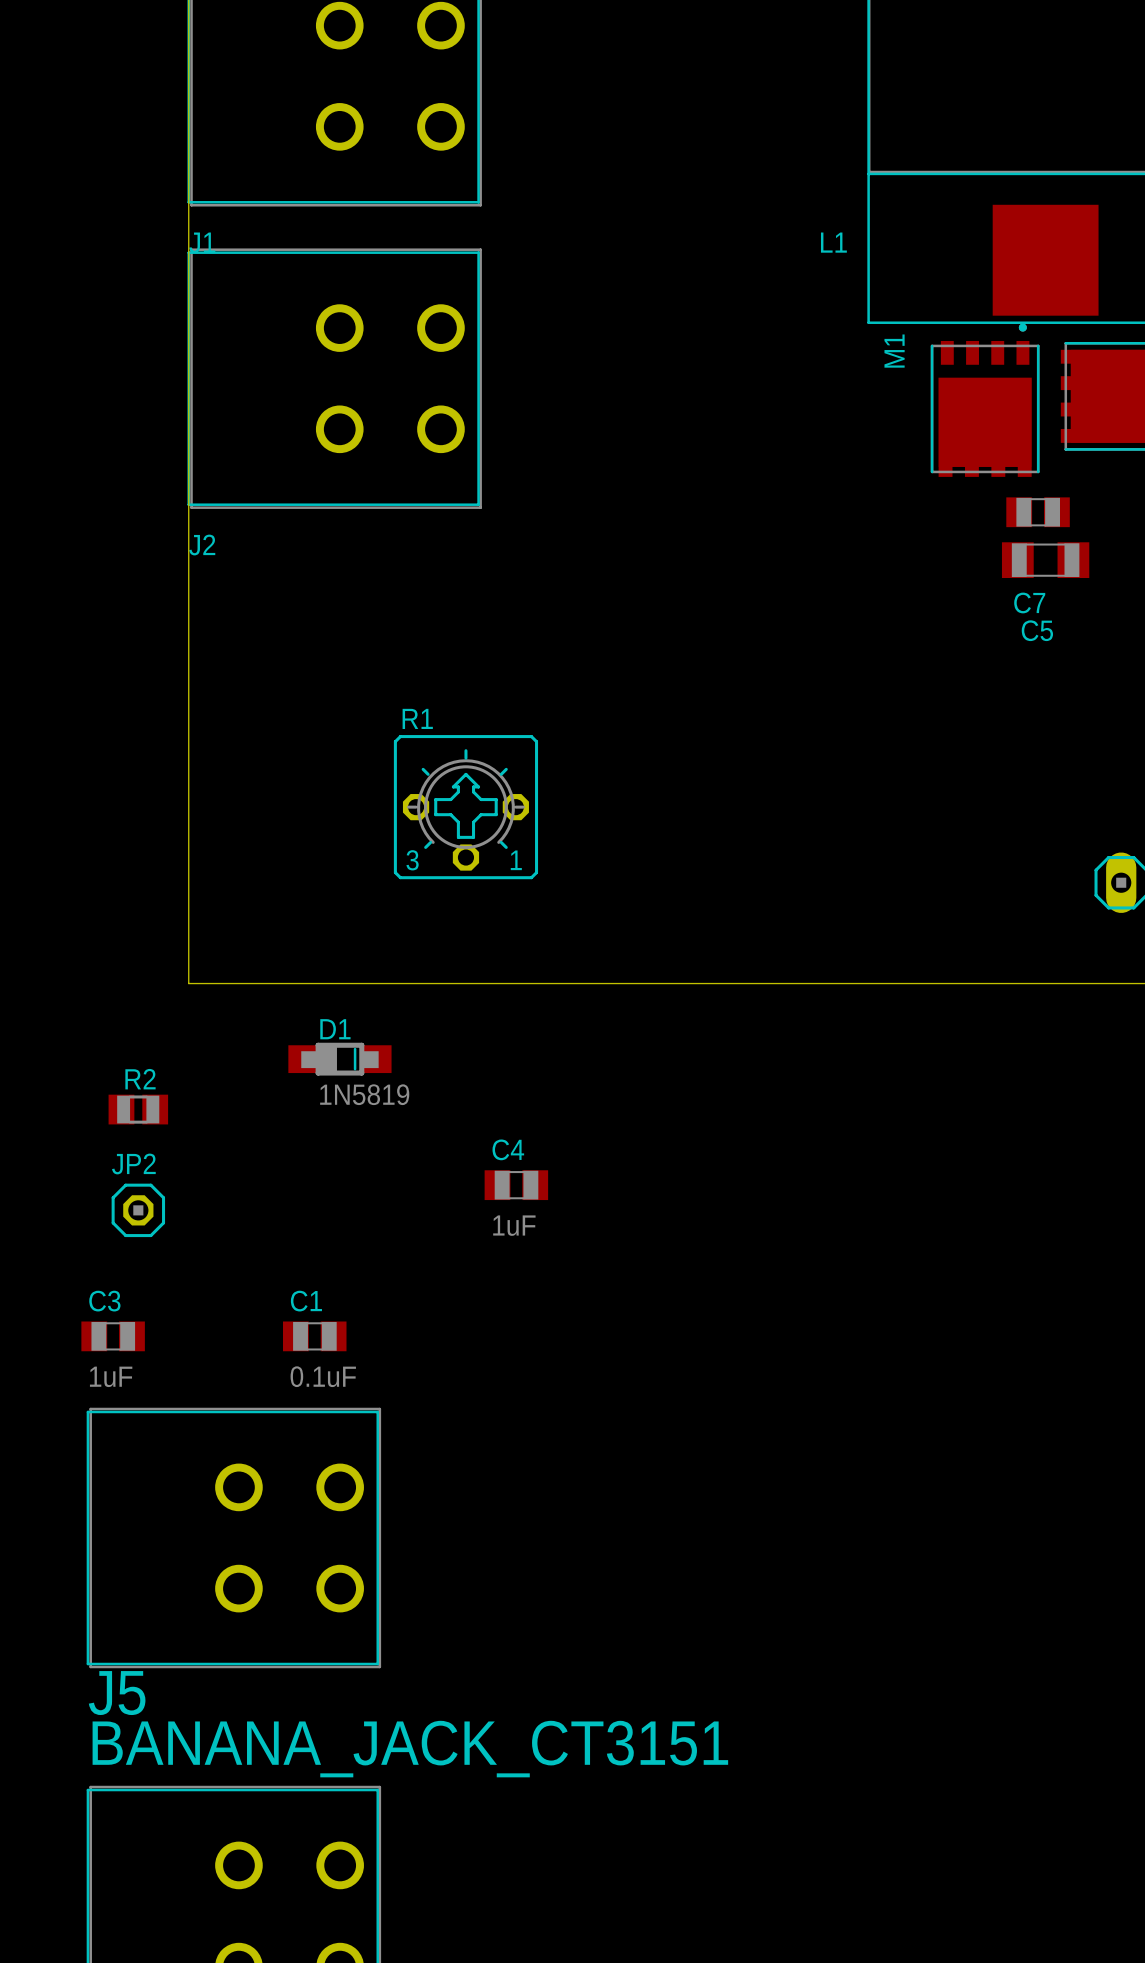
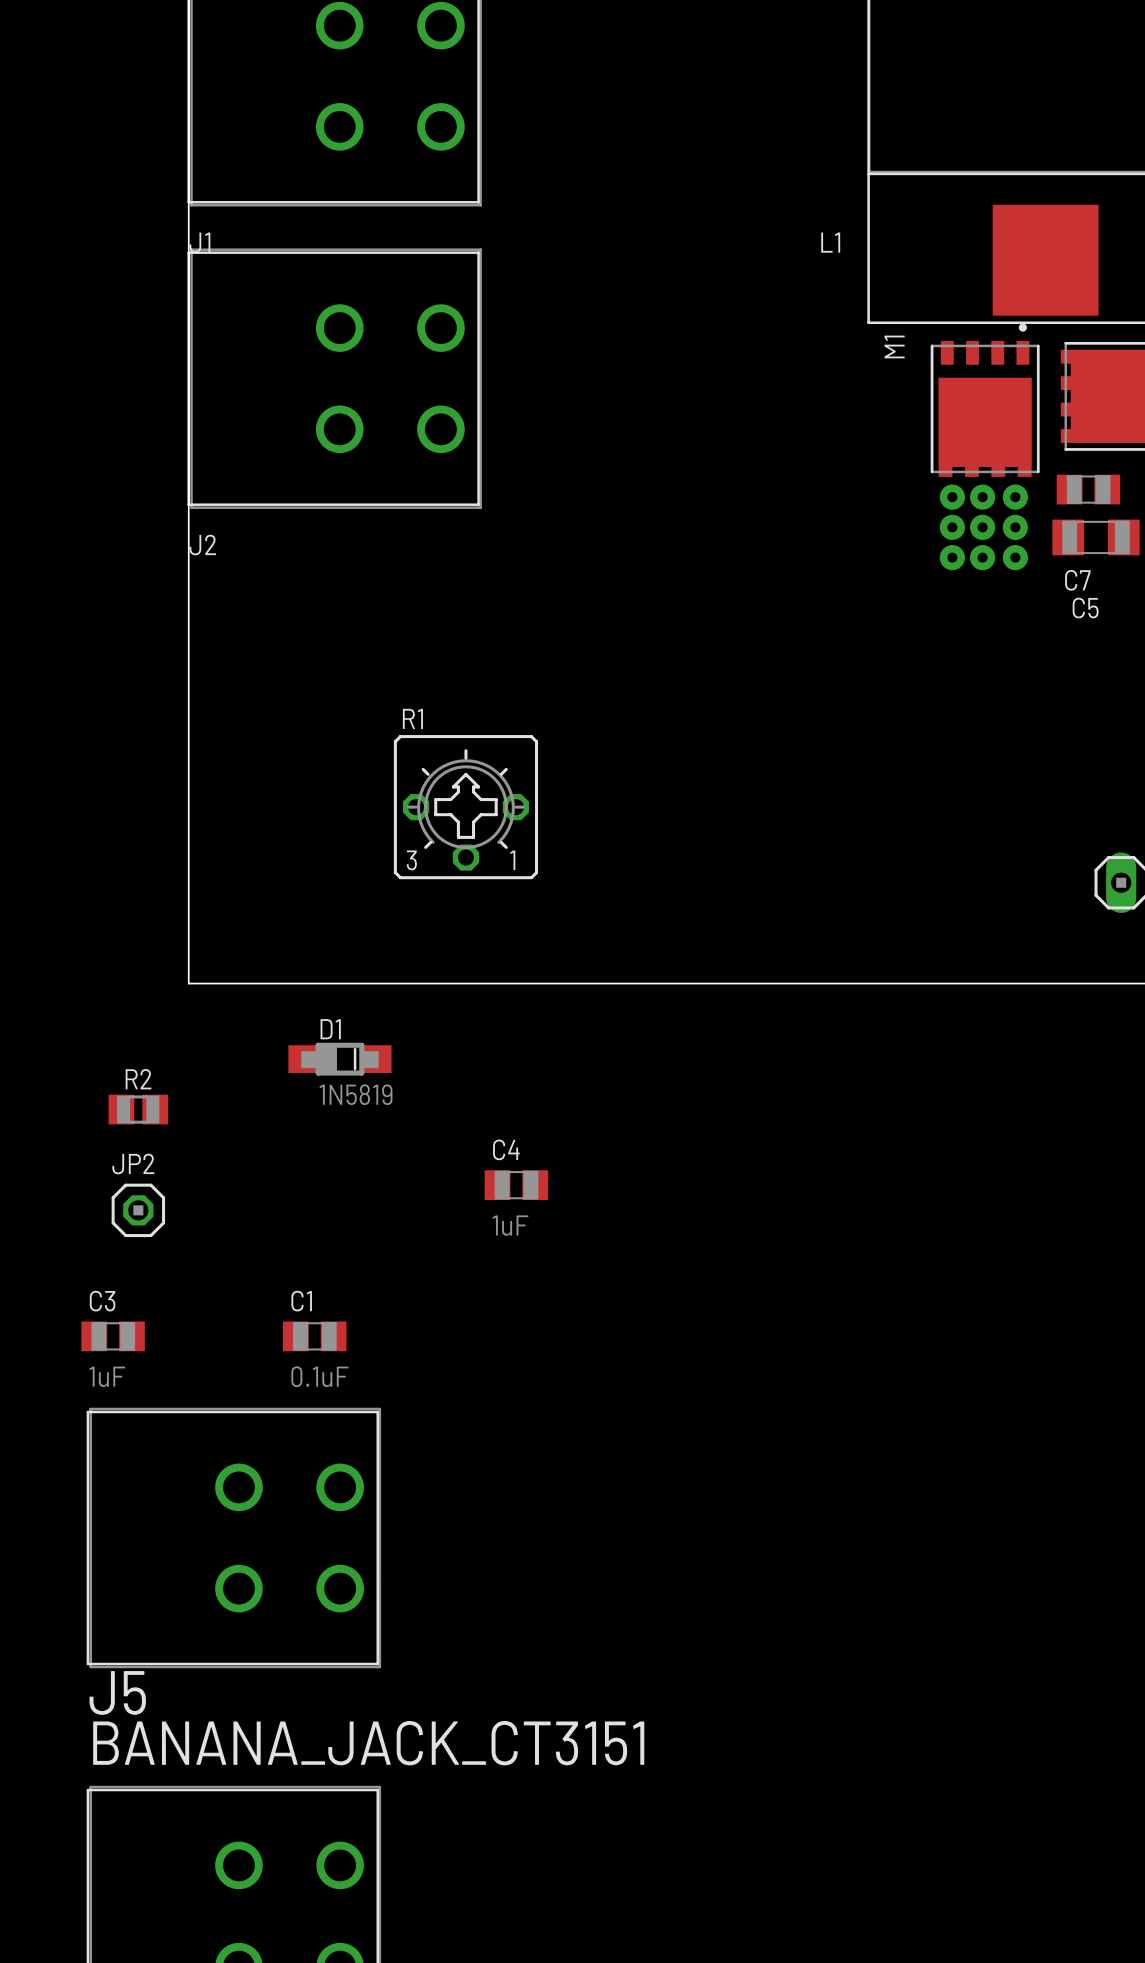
via: none -> (952, 497)
via: none -> (982, 497)
via: none -> (1015, 497)
C7 position: (1038, 512) -> (1088, 489)
via: none -> (952, 527)
via: none -> (982, 527)
via: none -> (1015, 527)
via: none -> (952, 557)
via: none -> (982, 557)
via: none -> (1015, 557)
C5 position: (1045, 560) -> (1096, 537)

